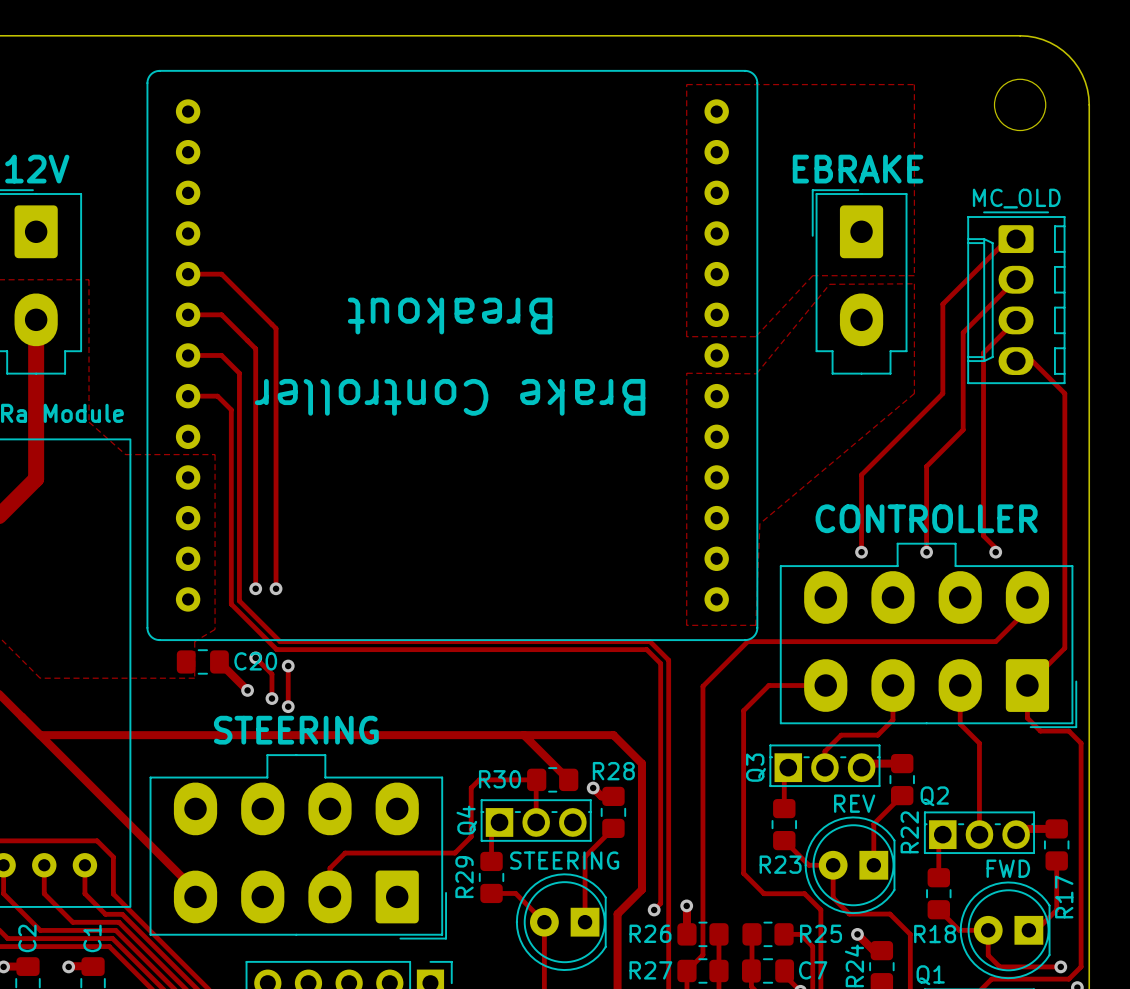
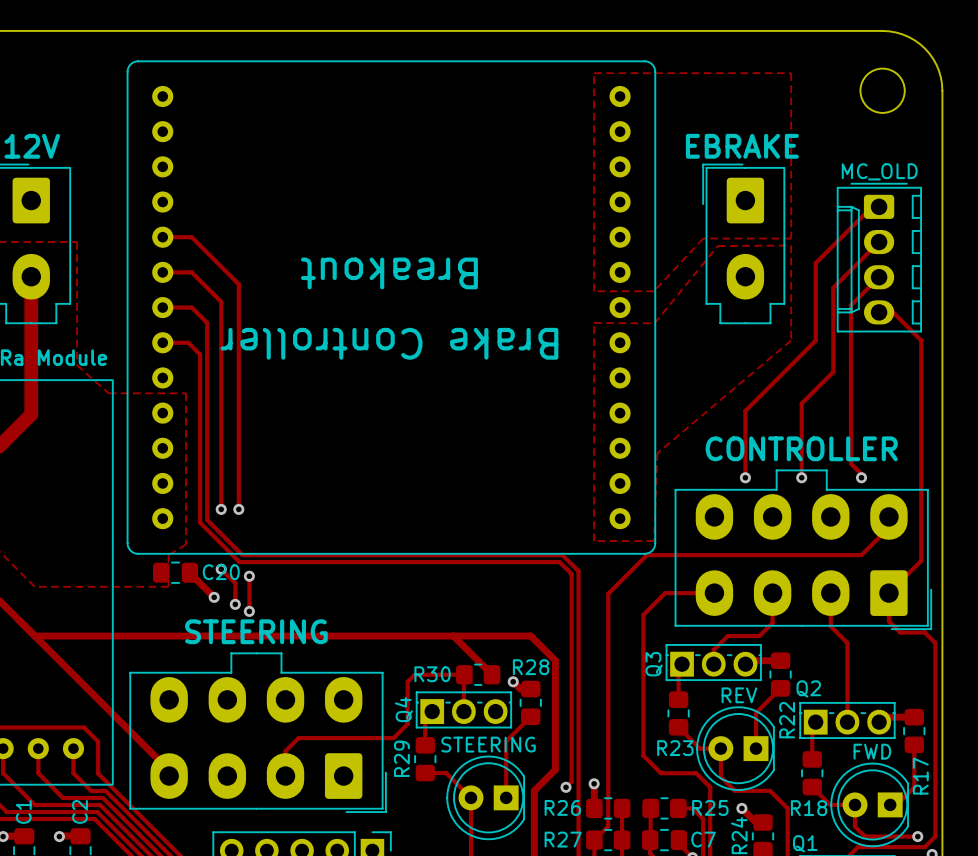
C2 name: C2 (27, 938) -> C1 (23, 811)
C1 name: C1 (92, 938) -> C2 (80, 811)

